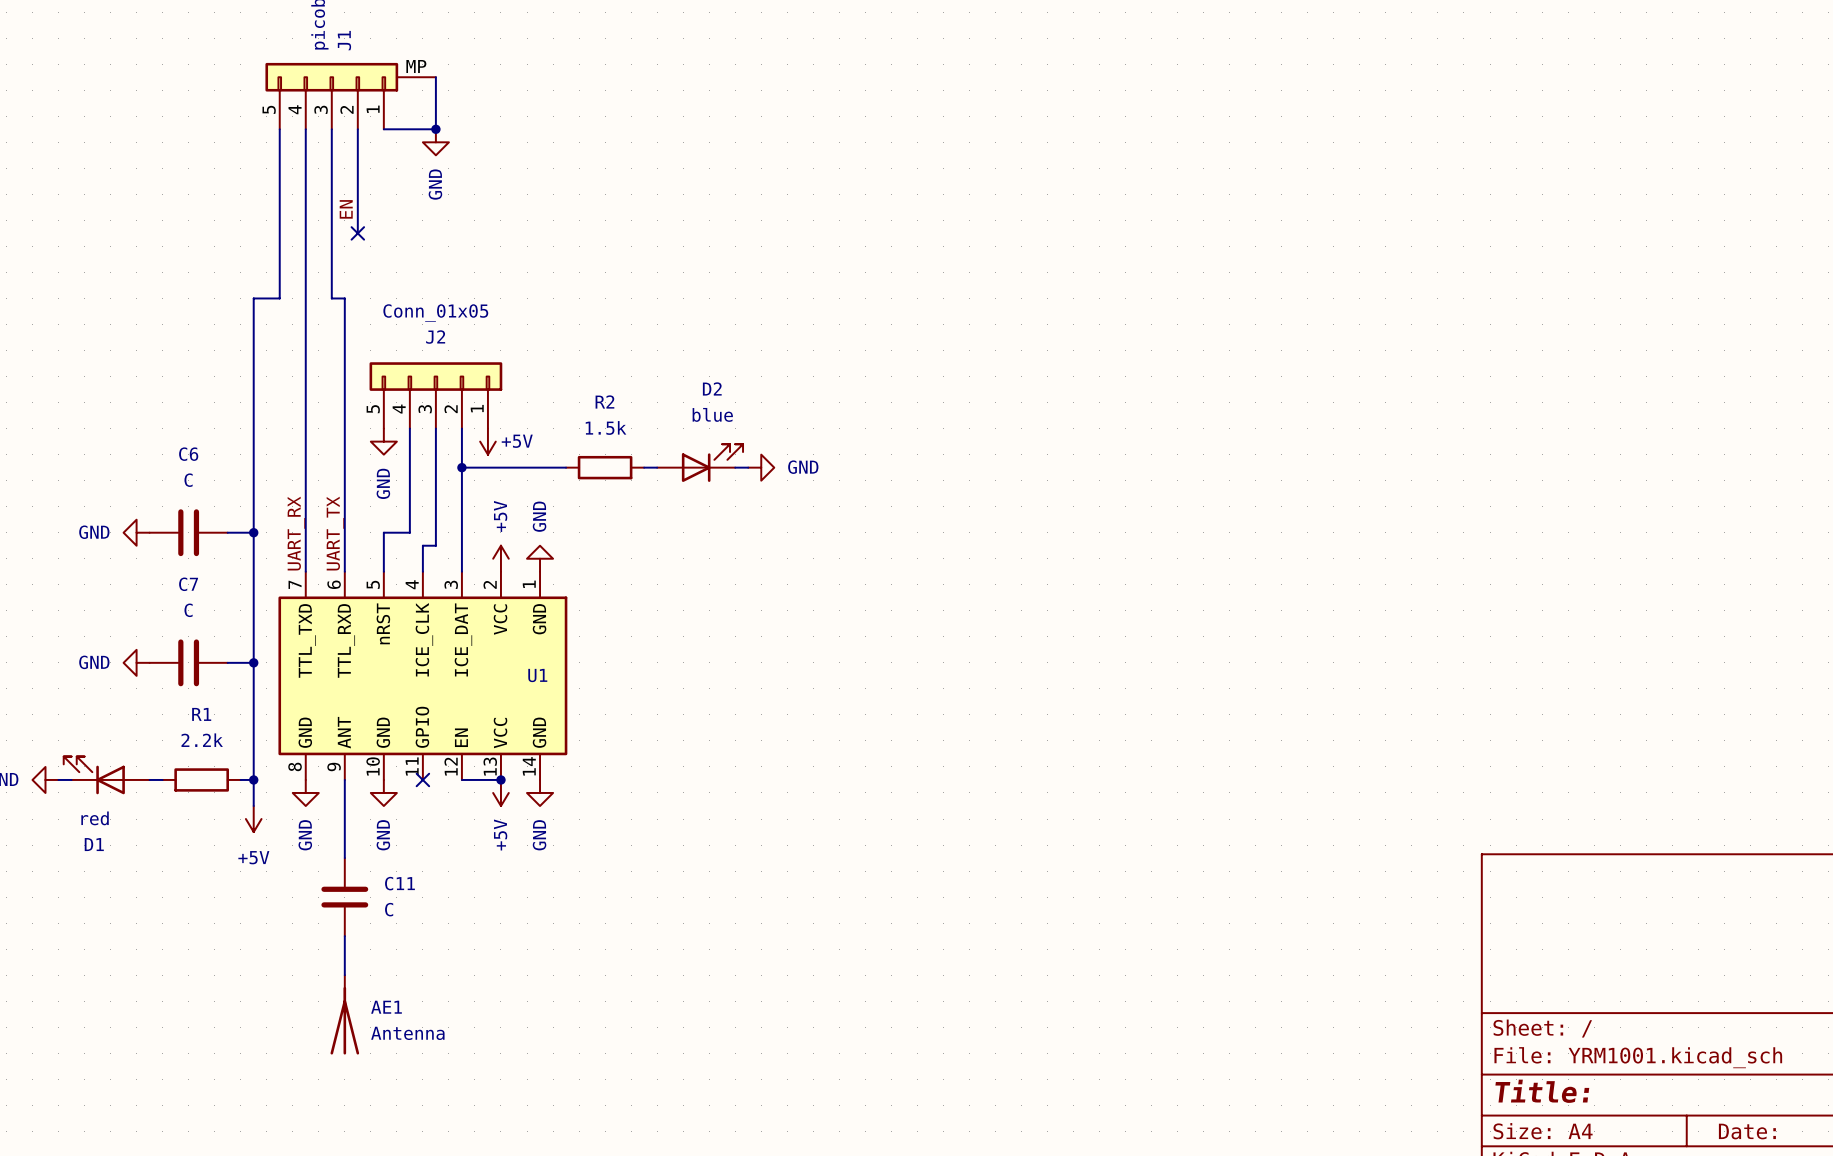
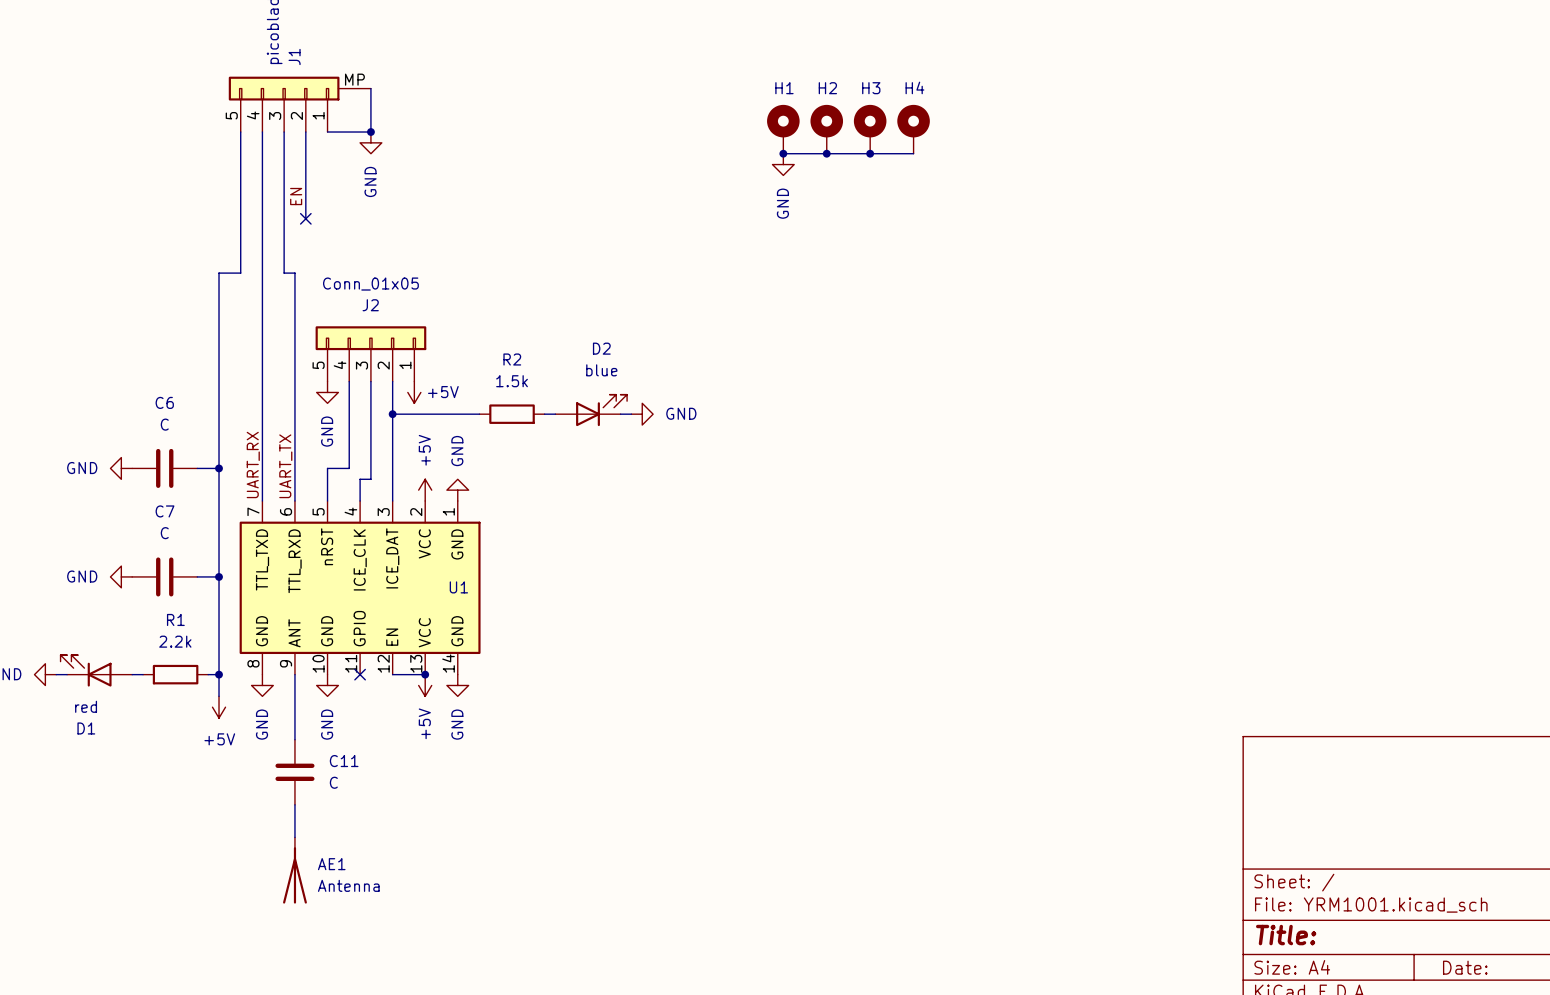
H1: none -> (783, 129)
H2: none -> (826, 129)
H3: none -> (870, 129)
H4: none -> (913, 129)
wire: none -> (783, 153) (913, 153)
junction: none -> (783, 153)
junction: none -> (826, 153)
junction: none -> (870, 153)
power symbol: none -> GND (783, 164)

